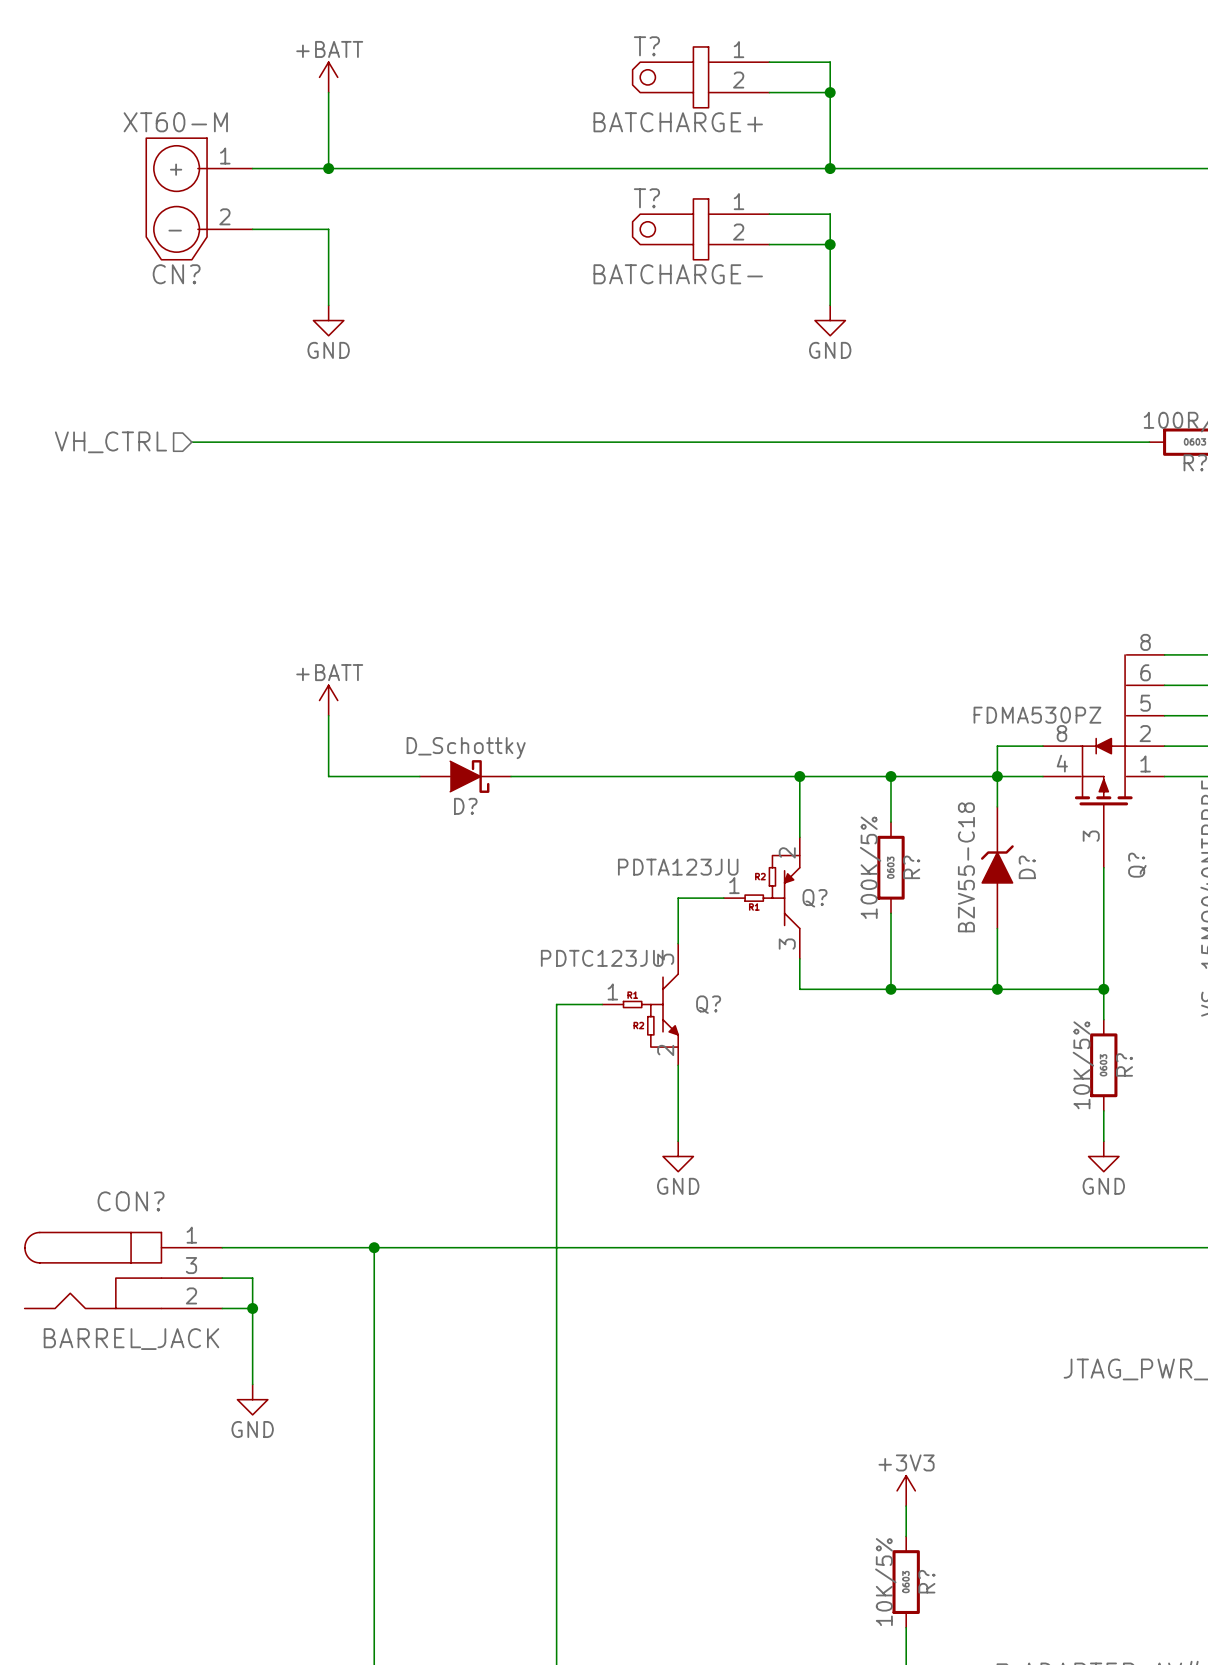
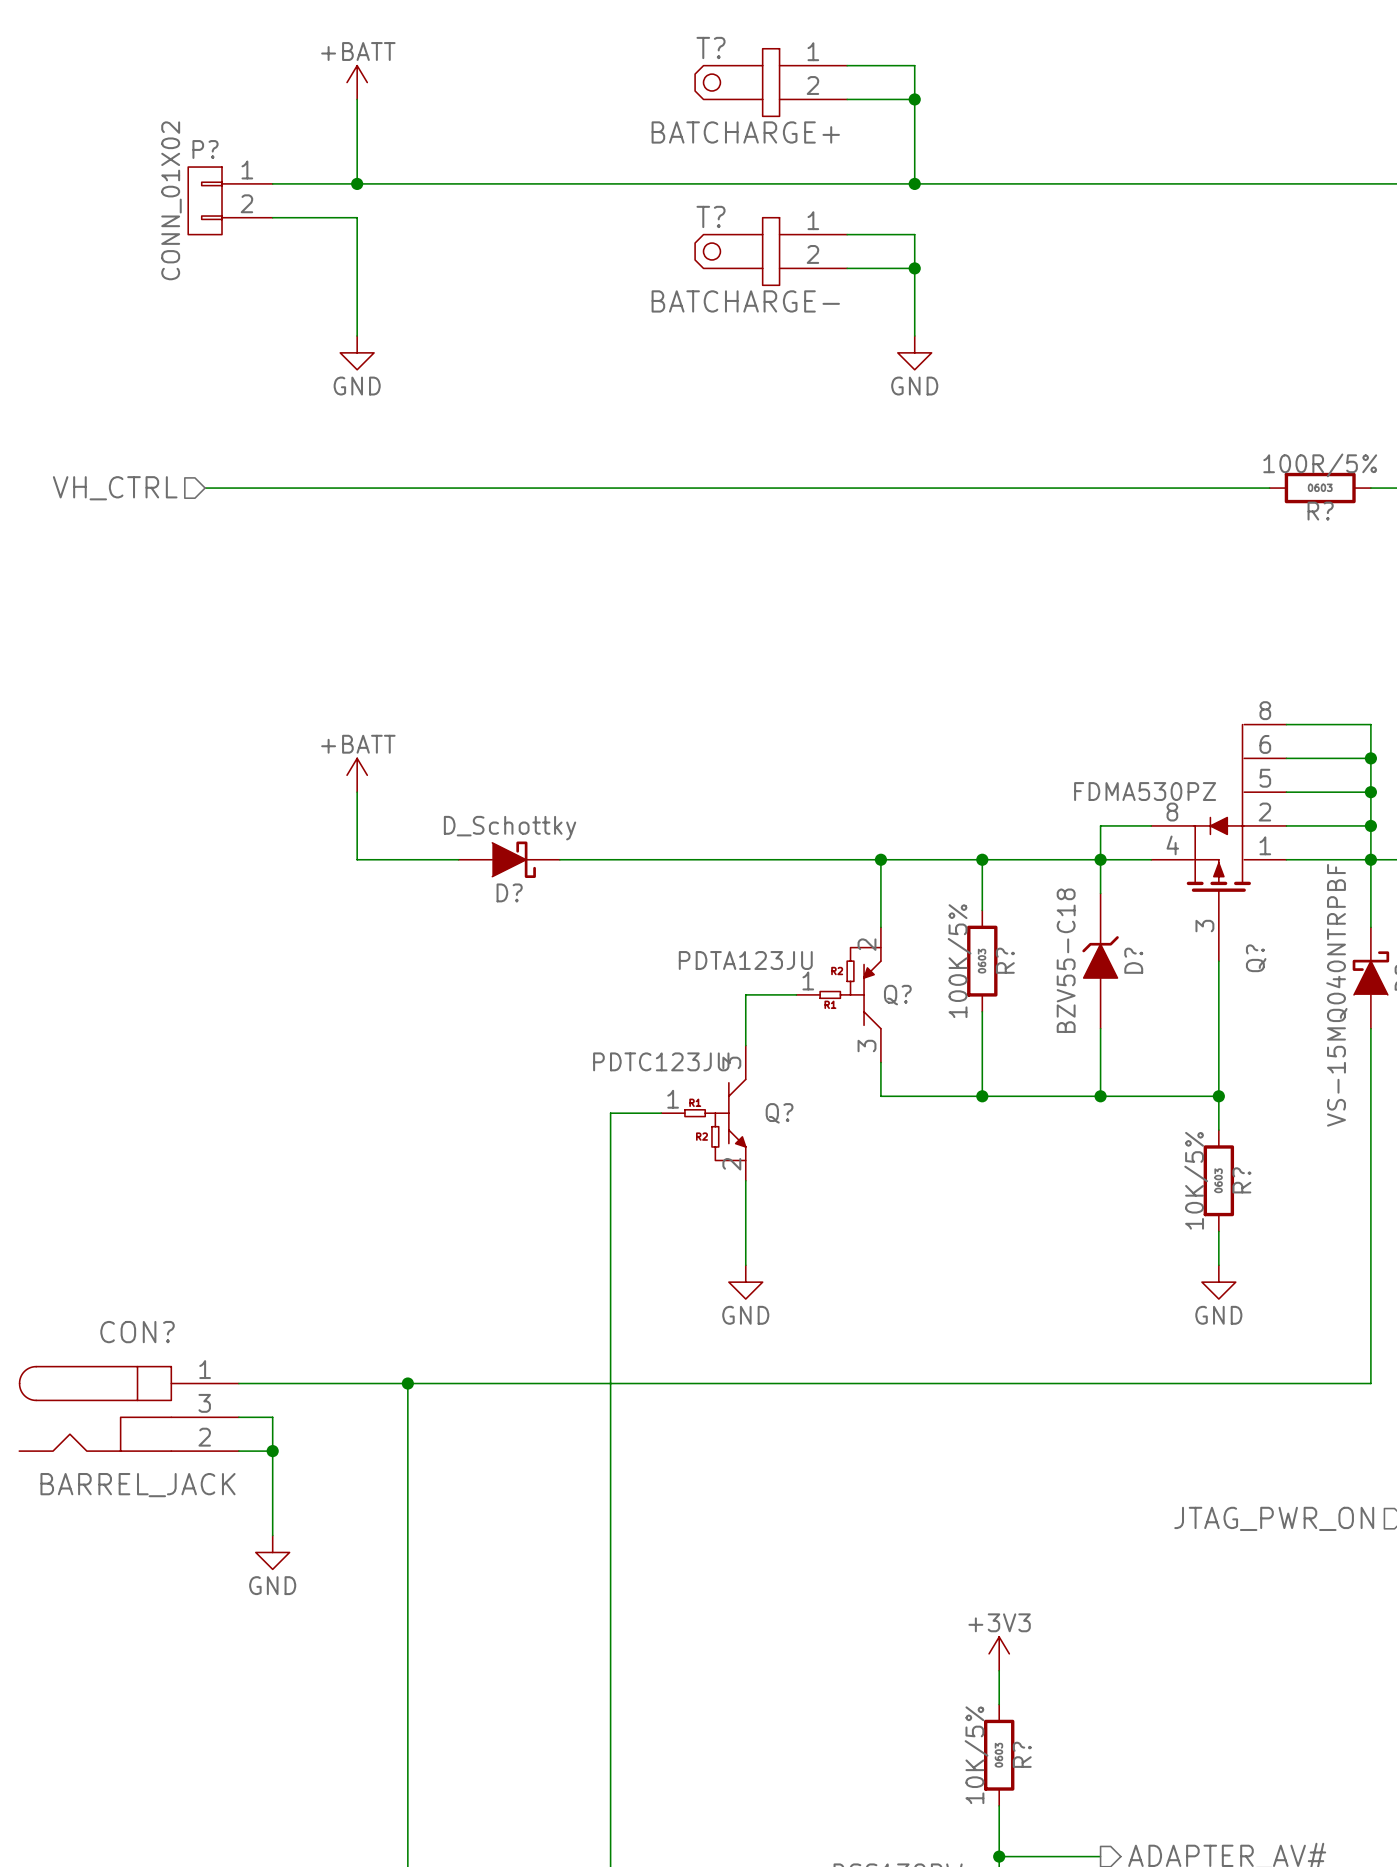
P?: none -> CONN_01X02 (230, 200)
CN?: XT60-M (199, 198) -> none
wire: (252, 229) (328, 229) -> (272, 217) (357, 217) (357, 251)

